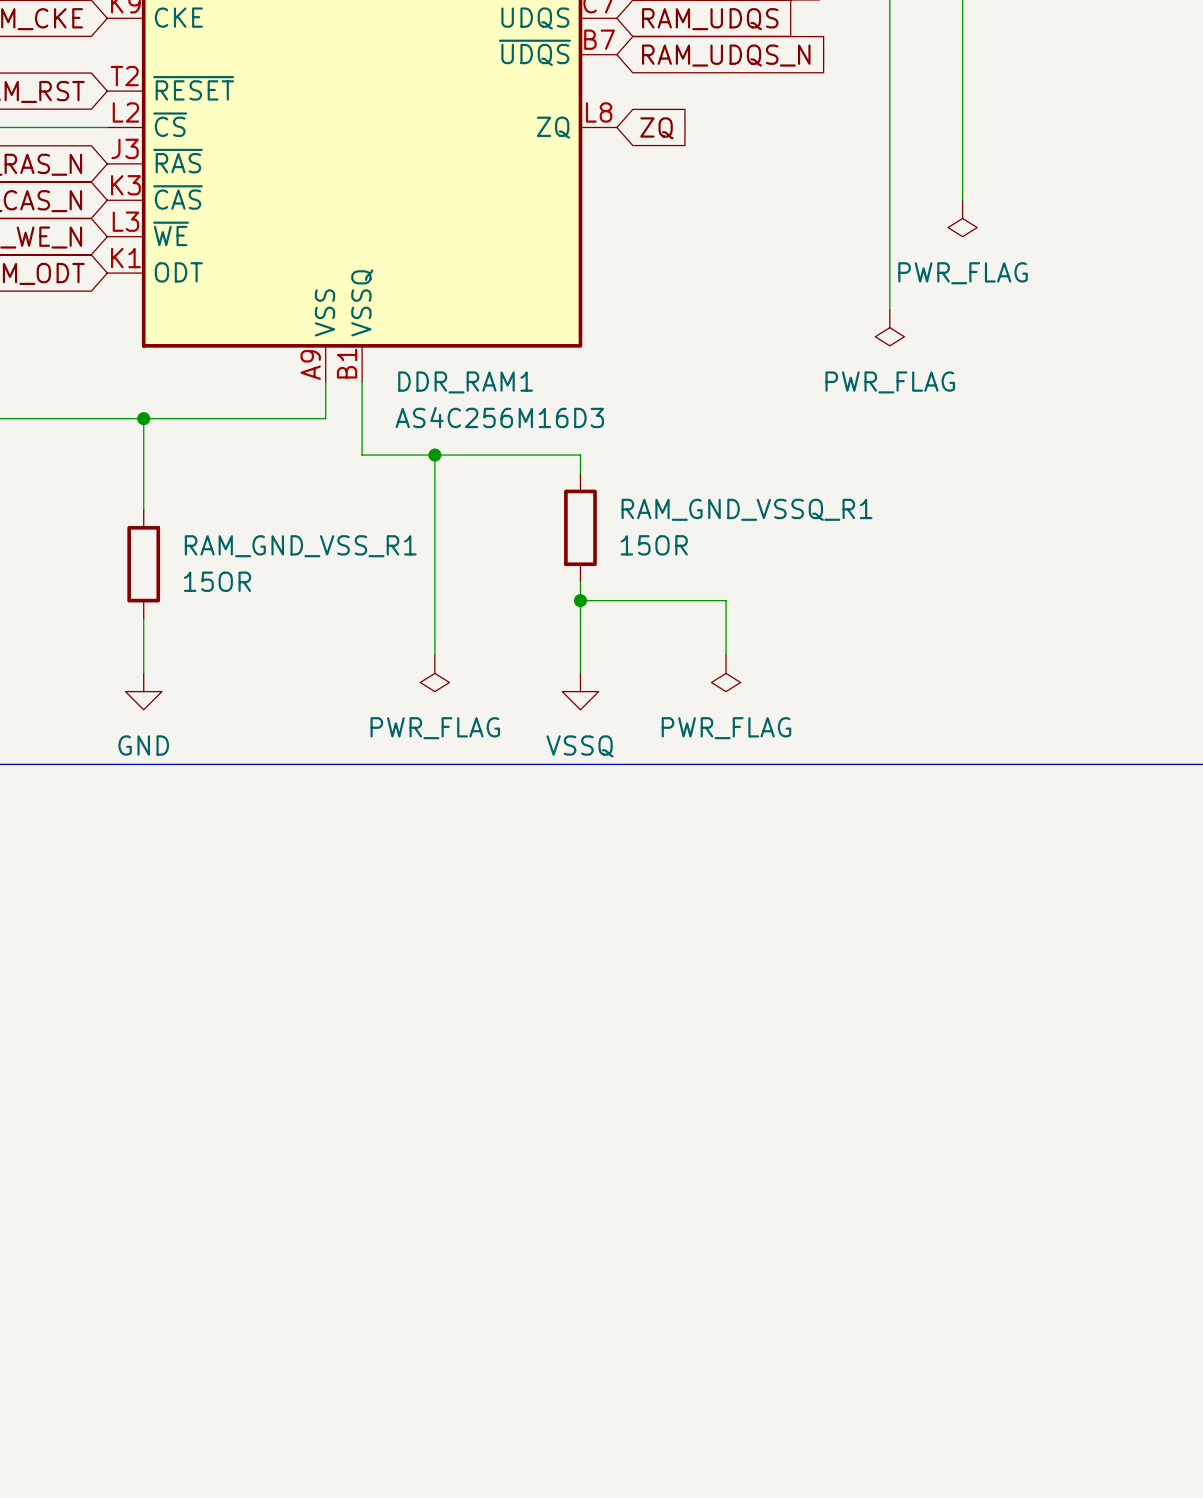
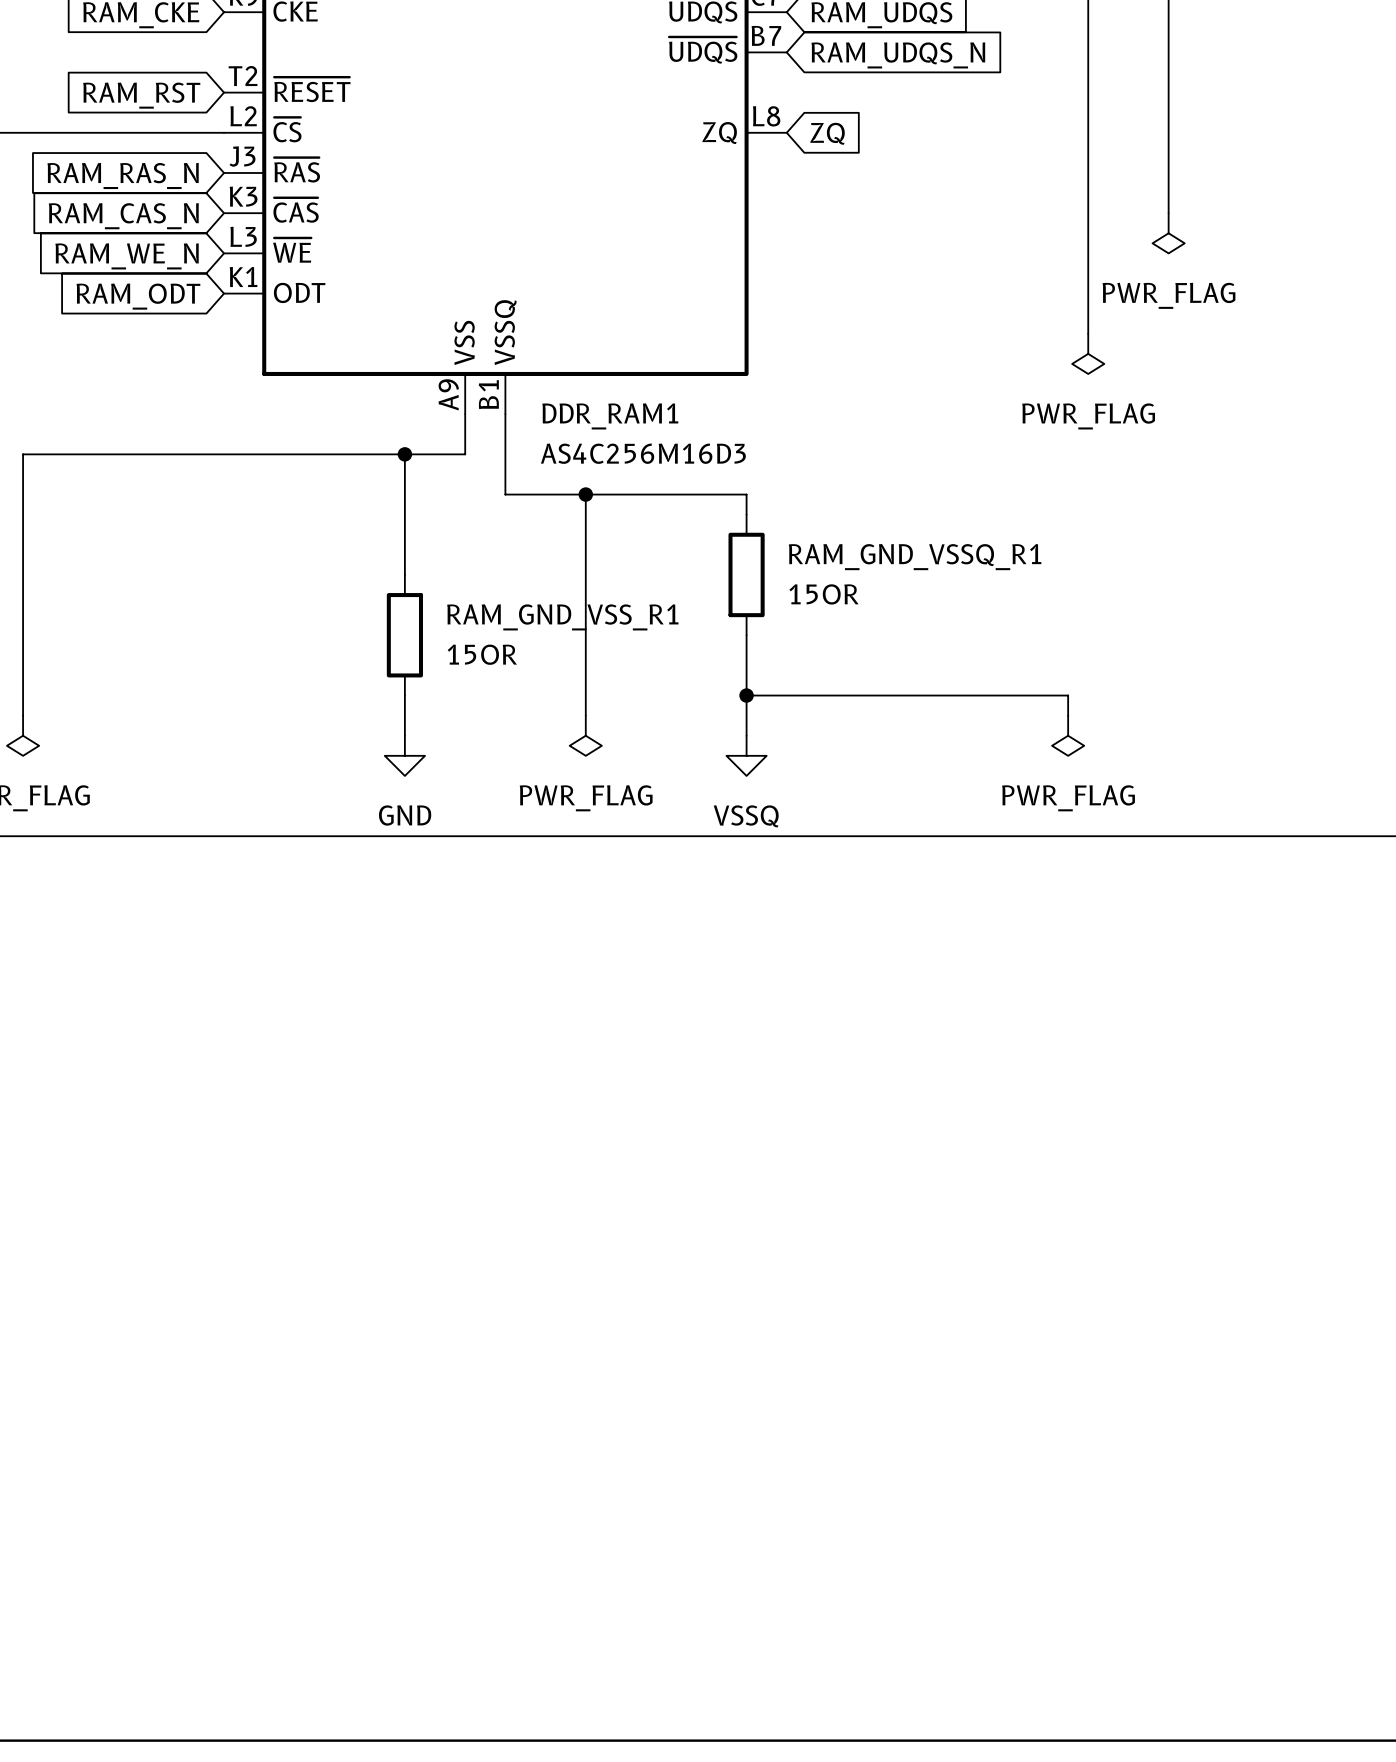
wire: (143, 418) (143, 509) -> none
junction: (143, 418) -> none
wire: none -> (404, 454) (404, 574)
junction: none -> (404, 454)
RAM_GND_VSS_R1 position: (143, 564) -> (404, 635)
wire: (580, 600) (726, 600) (726, 655) -> none
junction position: (580, 600) -> (746, 695)
wire: (143, 618) (143, 673) -> none
wire: none -> (404, 695) (404, 735)
wire: none -> (746, 695) (1068, 695) (1068, 715)
power symbol position: PWR_FLAG (726, 673) -> PWR_FLAG (1068, 735)
power symbol position: GND (143, 691) -> GND (404, 755)

